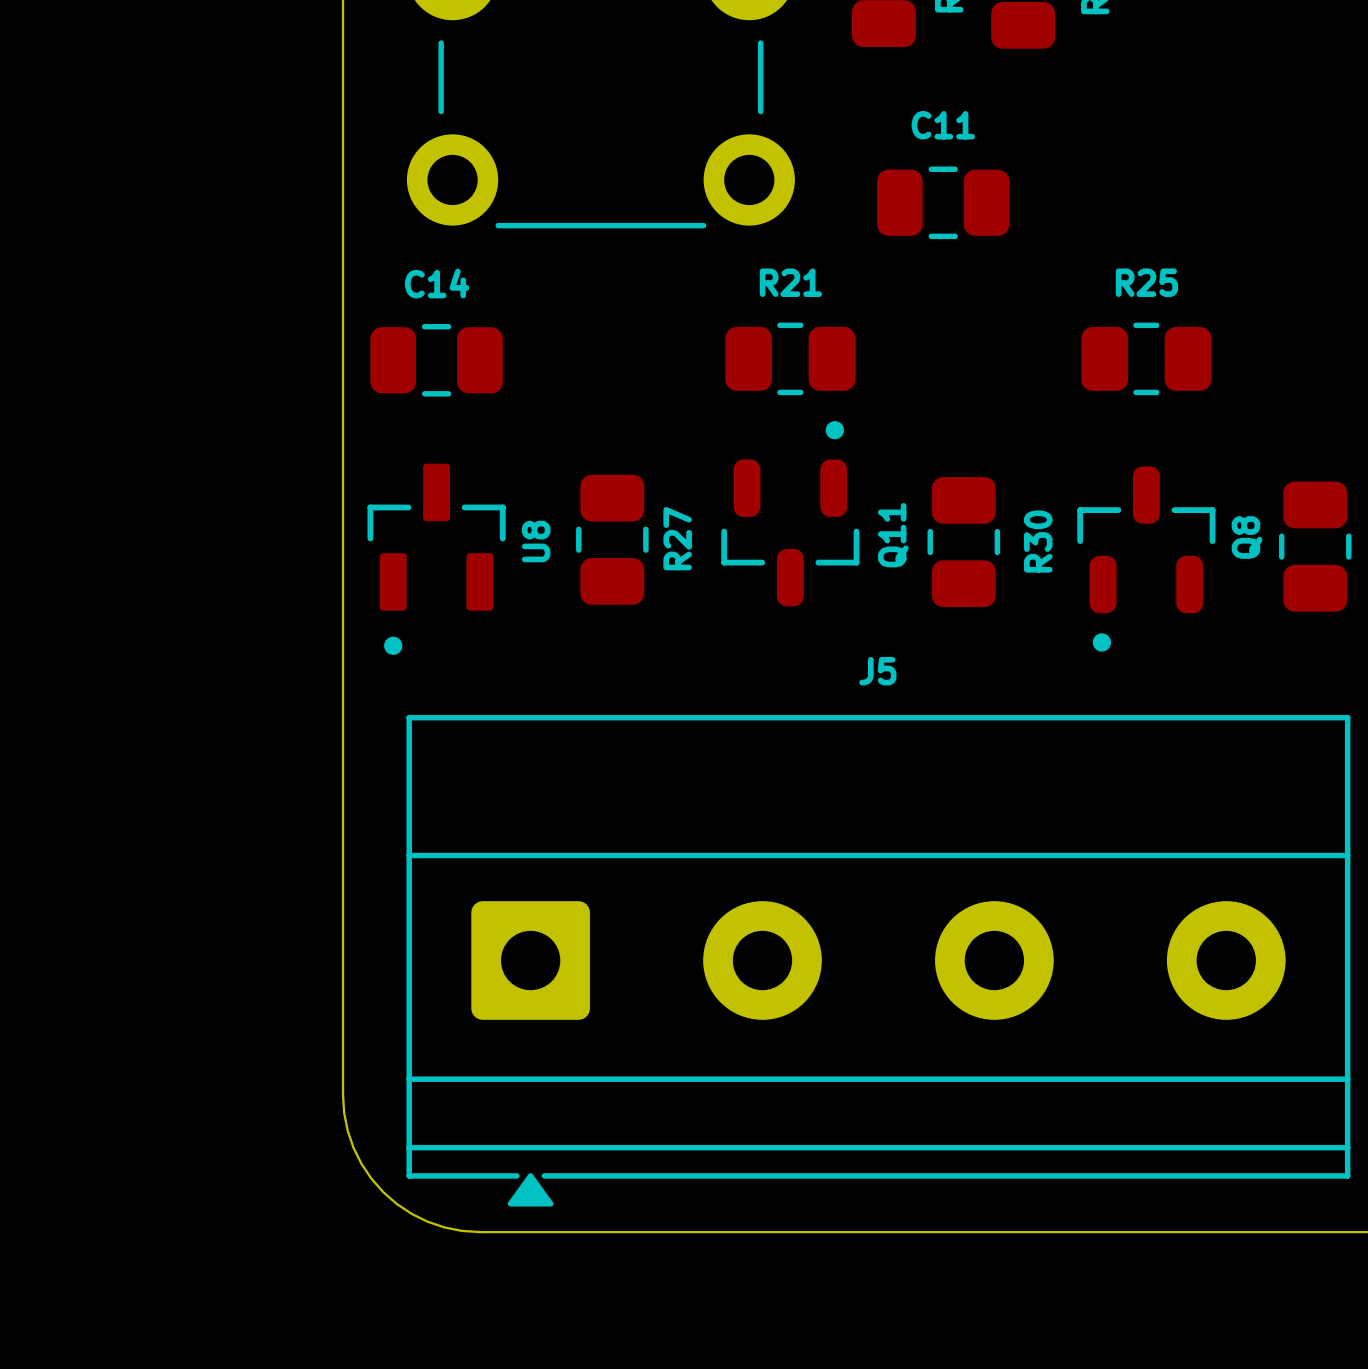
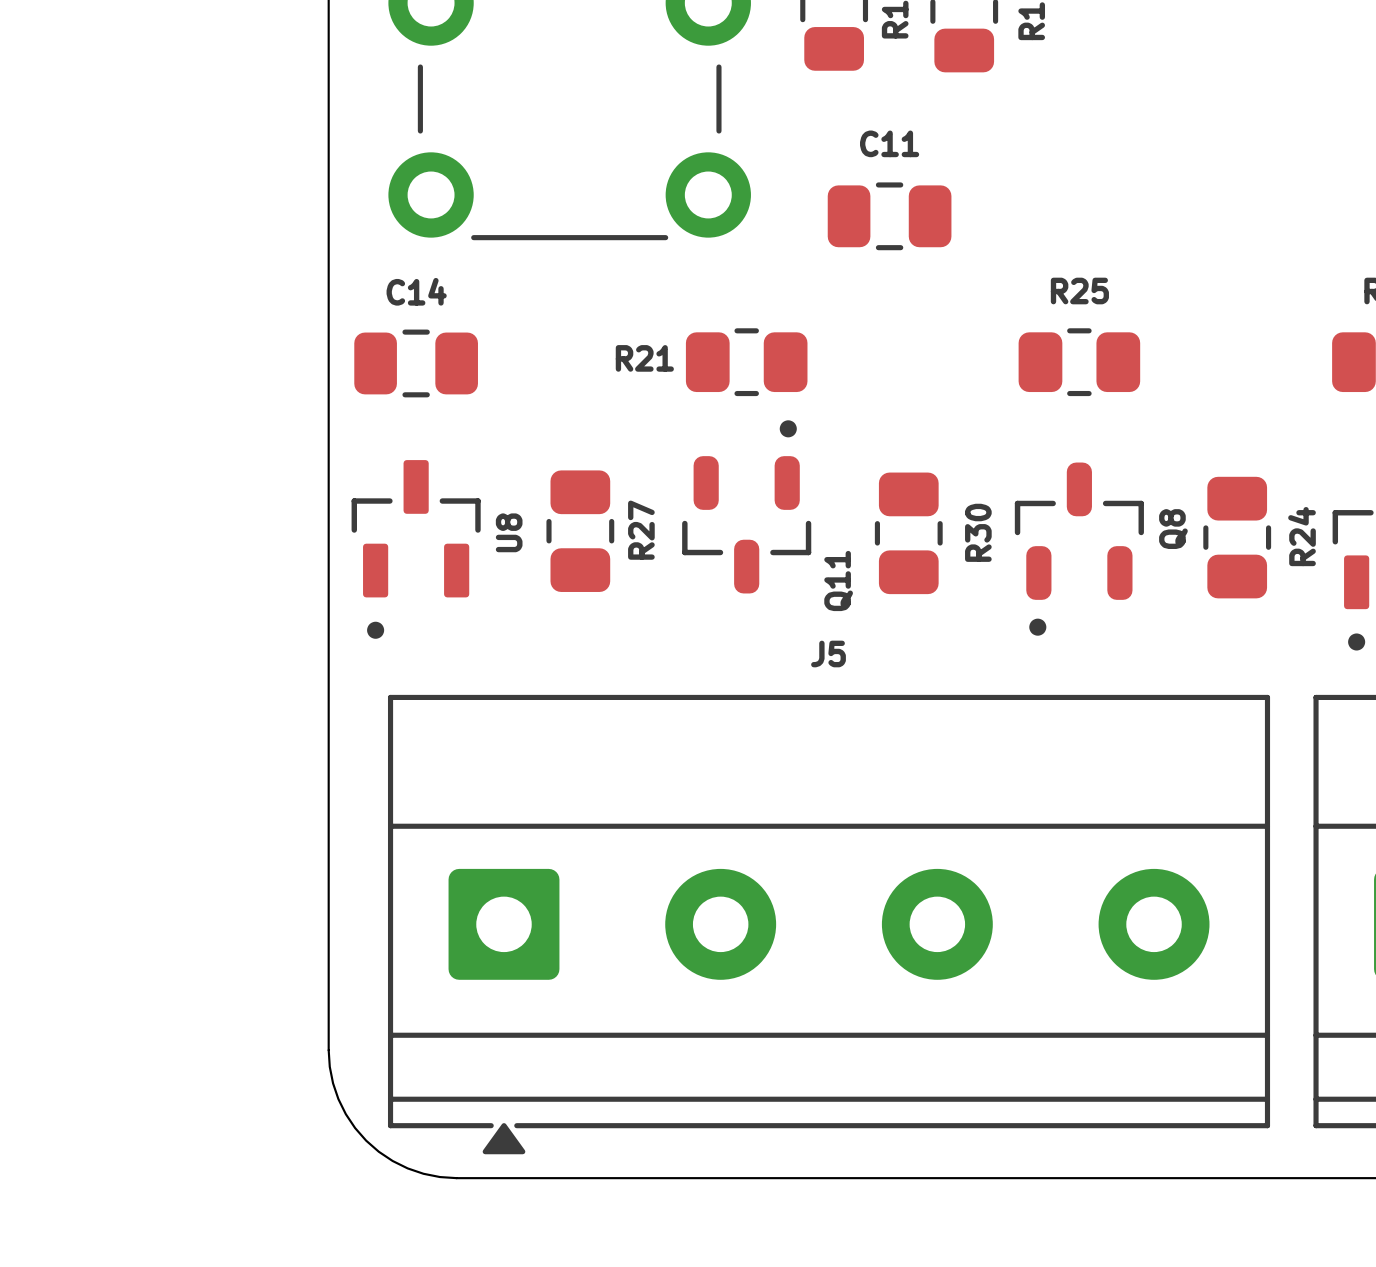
R21 name position: R21 (790, 282) -> R21 (644, 358)
Q11 name position: Q11 (893, 535) -> Q11 (838, 580)

